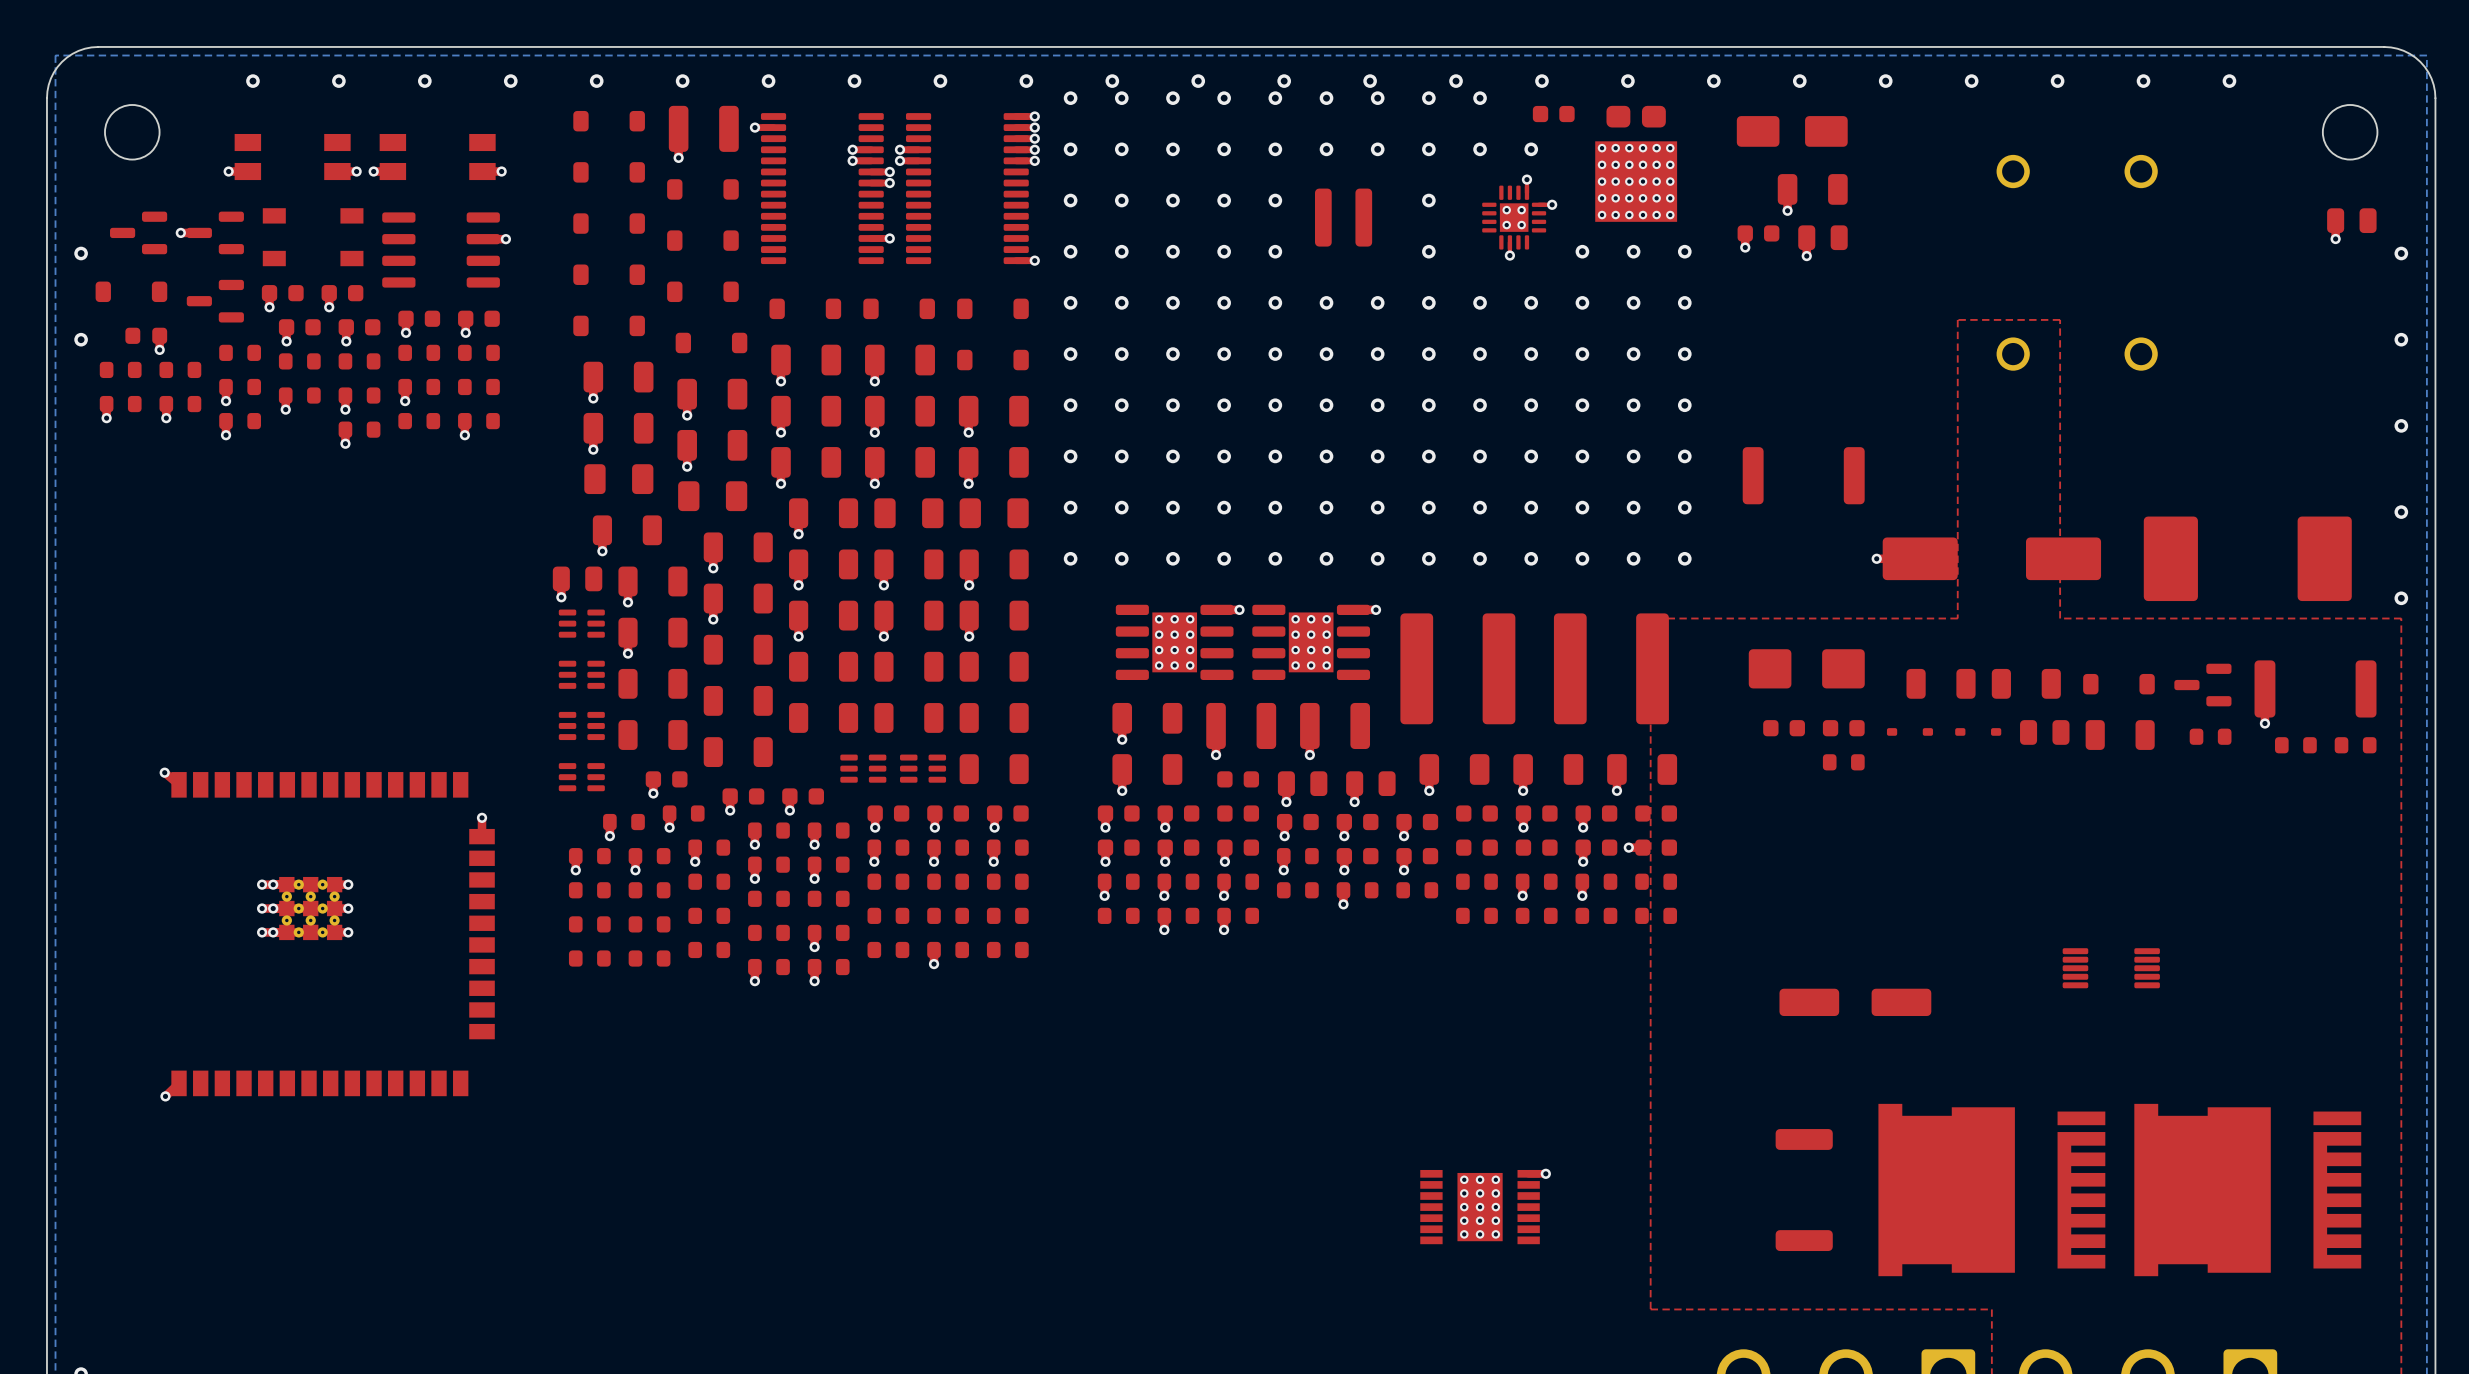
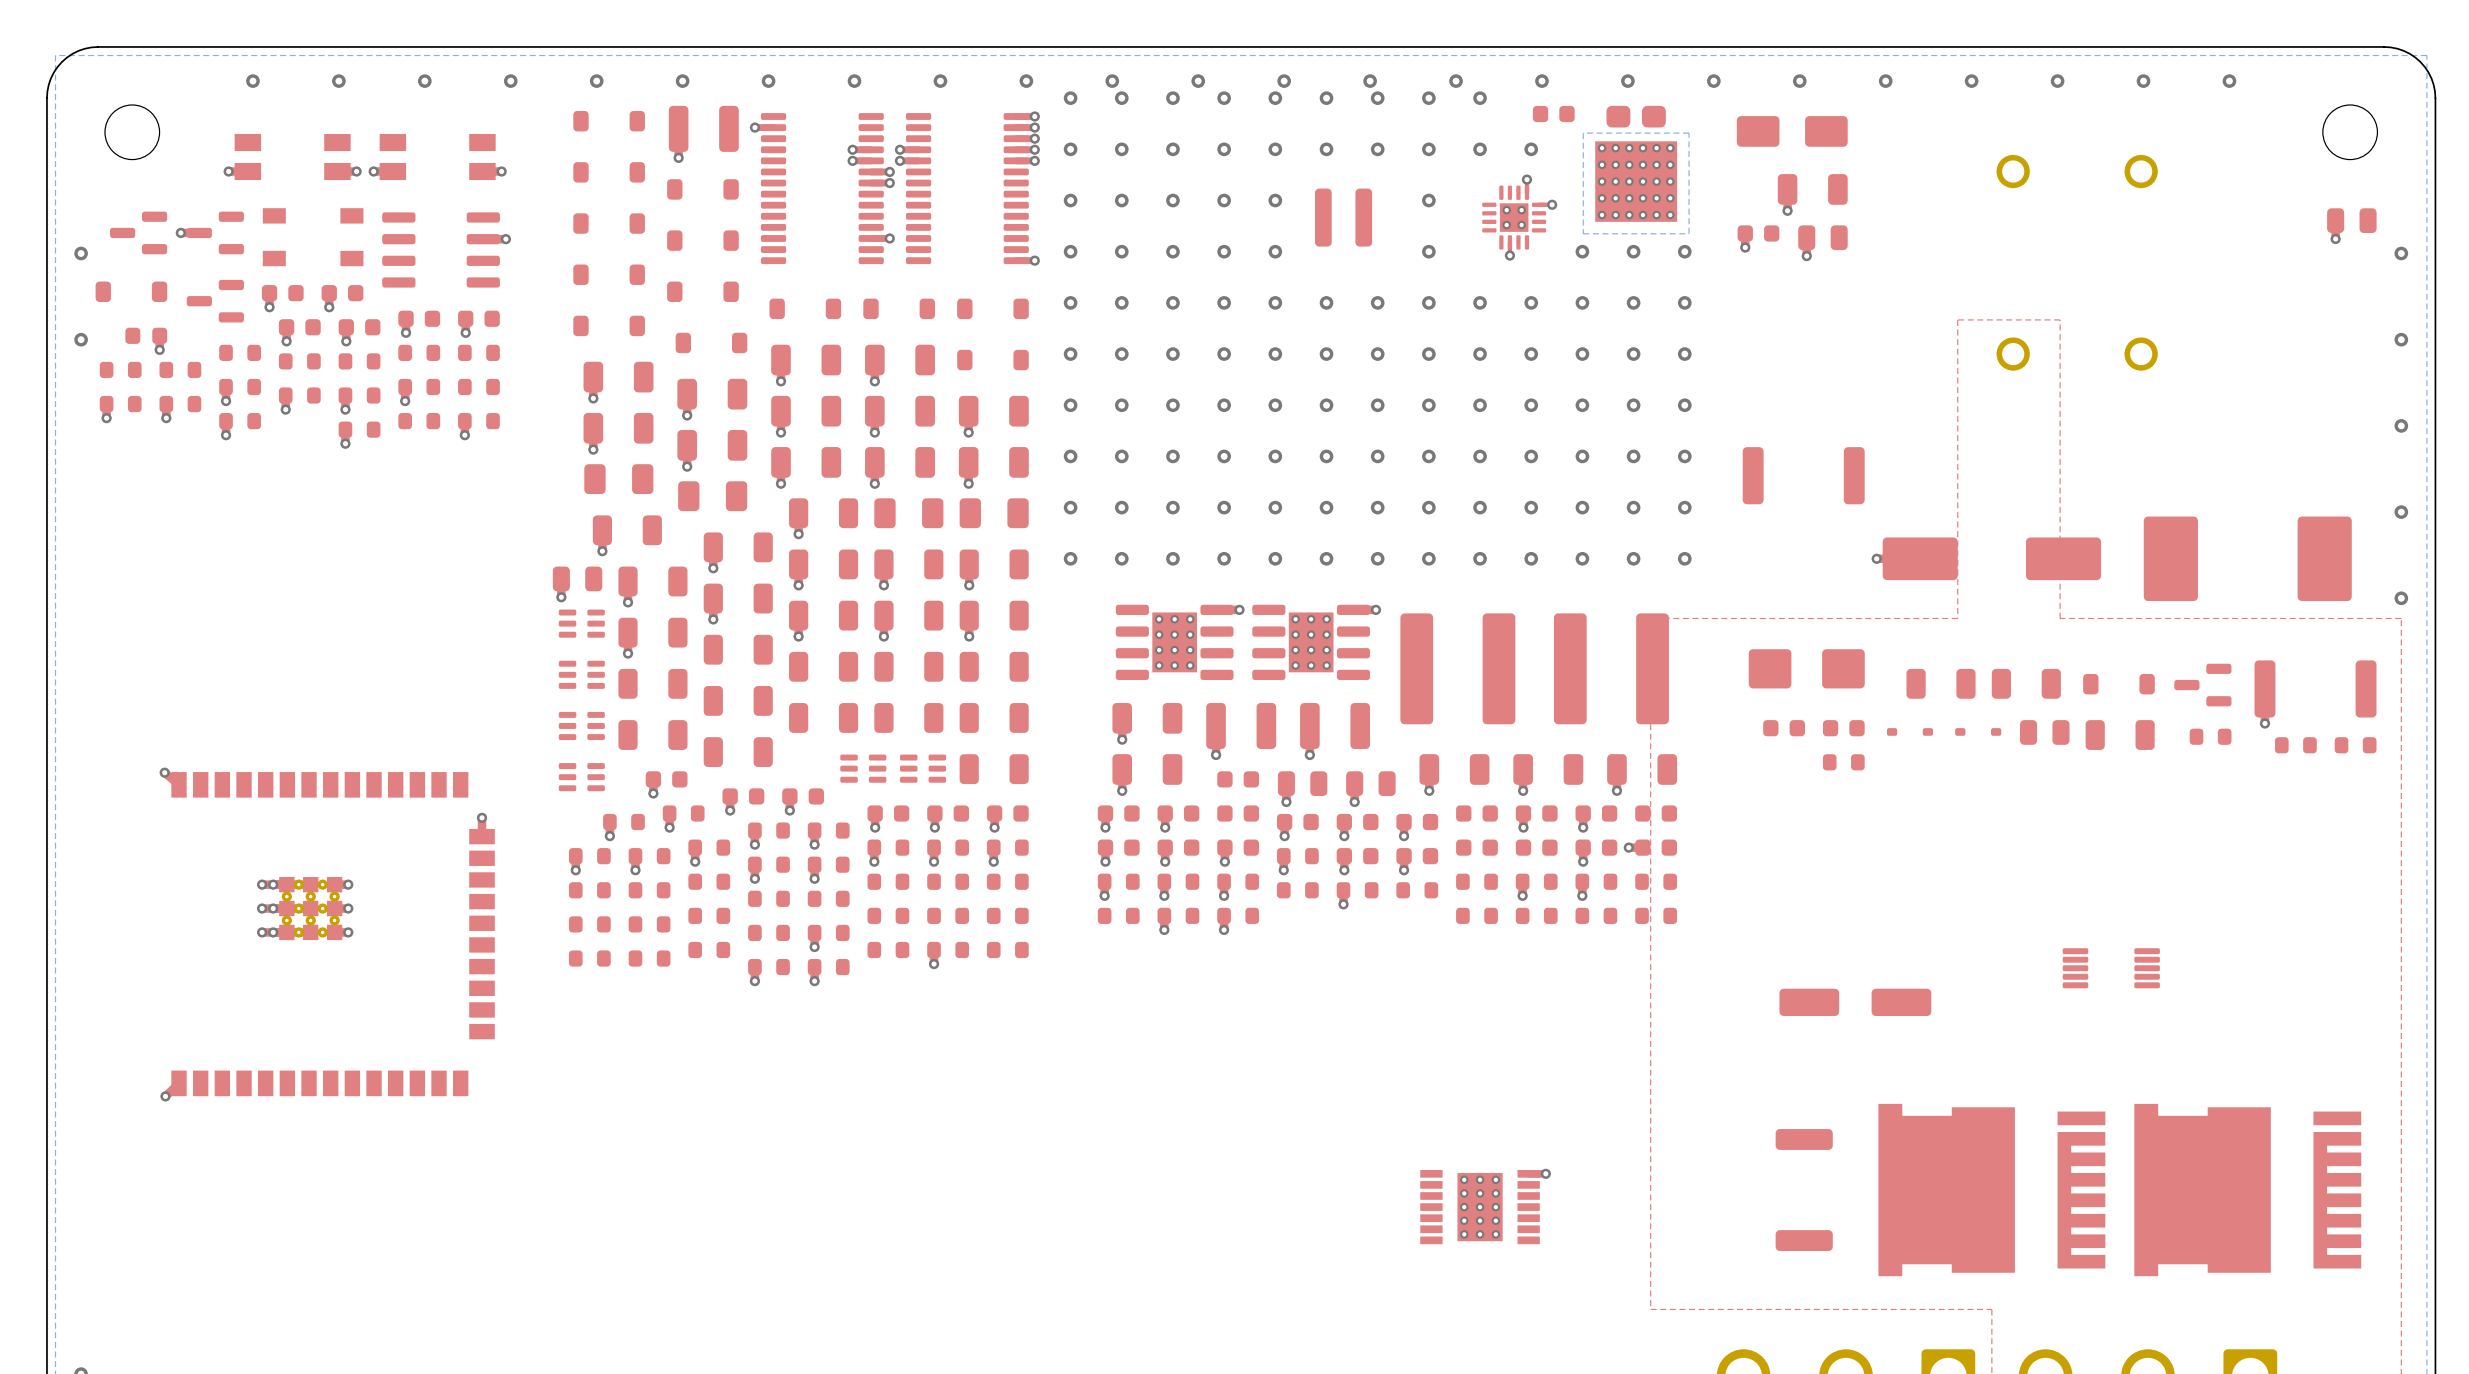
bottom zone outline: none -> (1689, 133) (1583, 133) (1583, 233) (1689, 233) (1689, 133)

